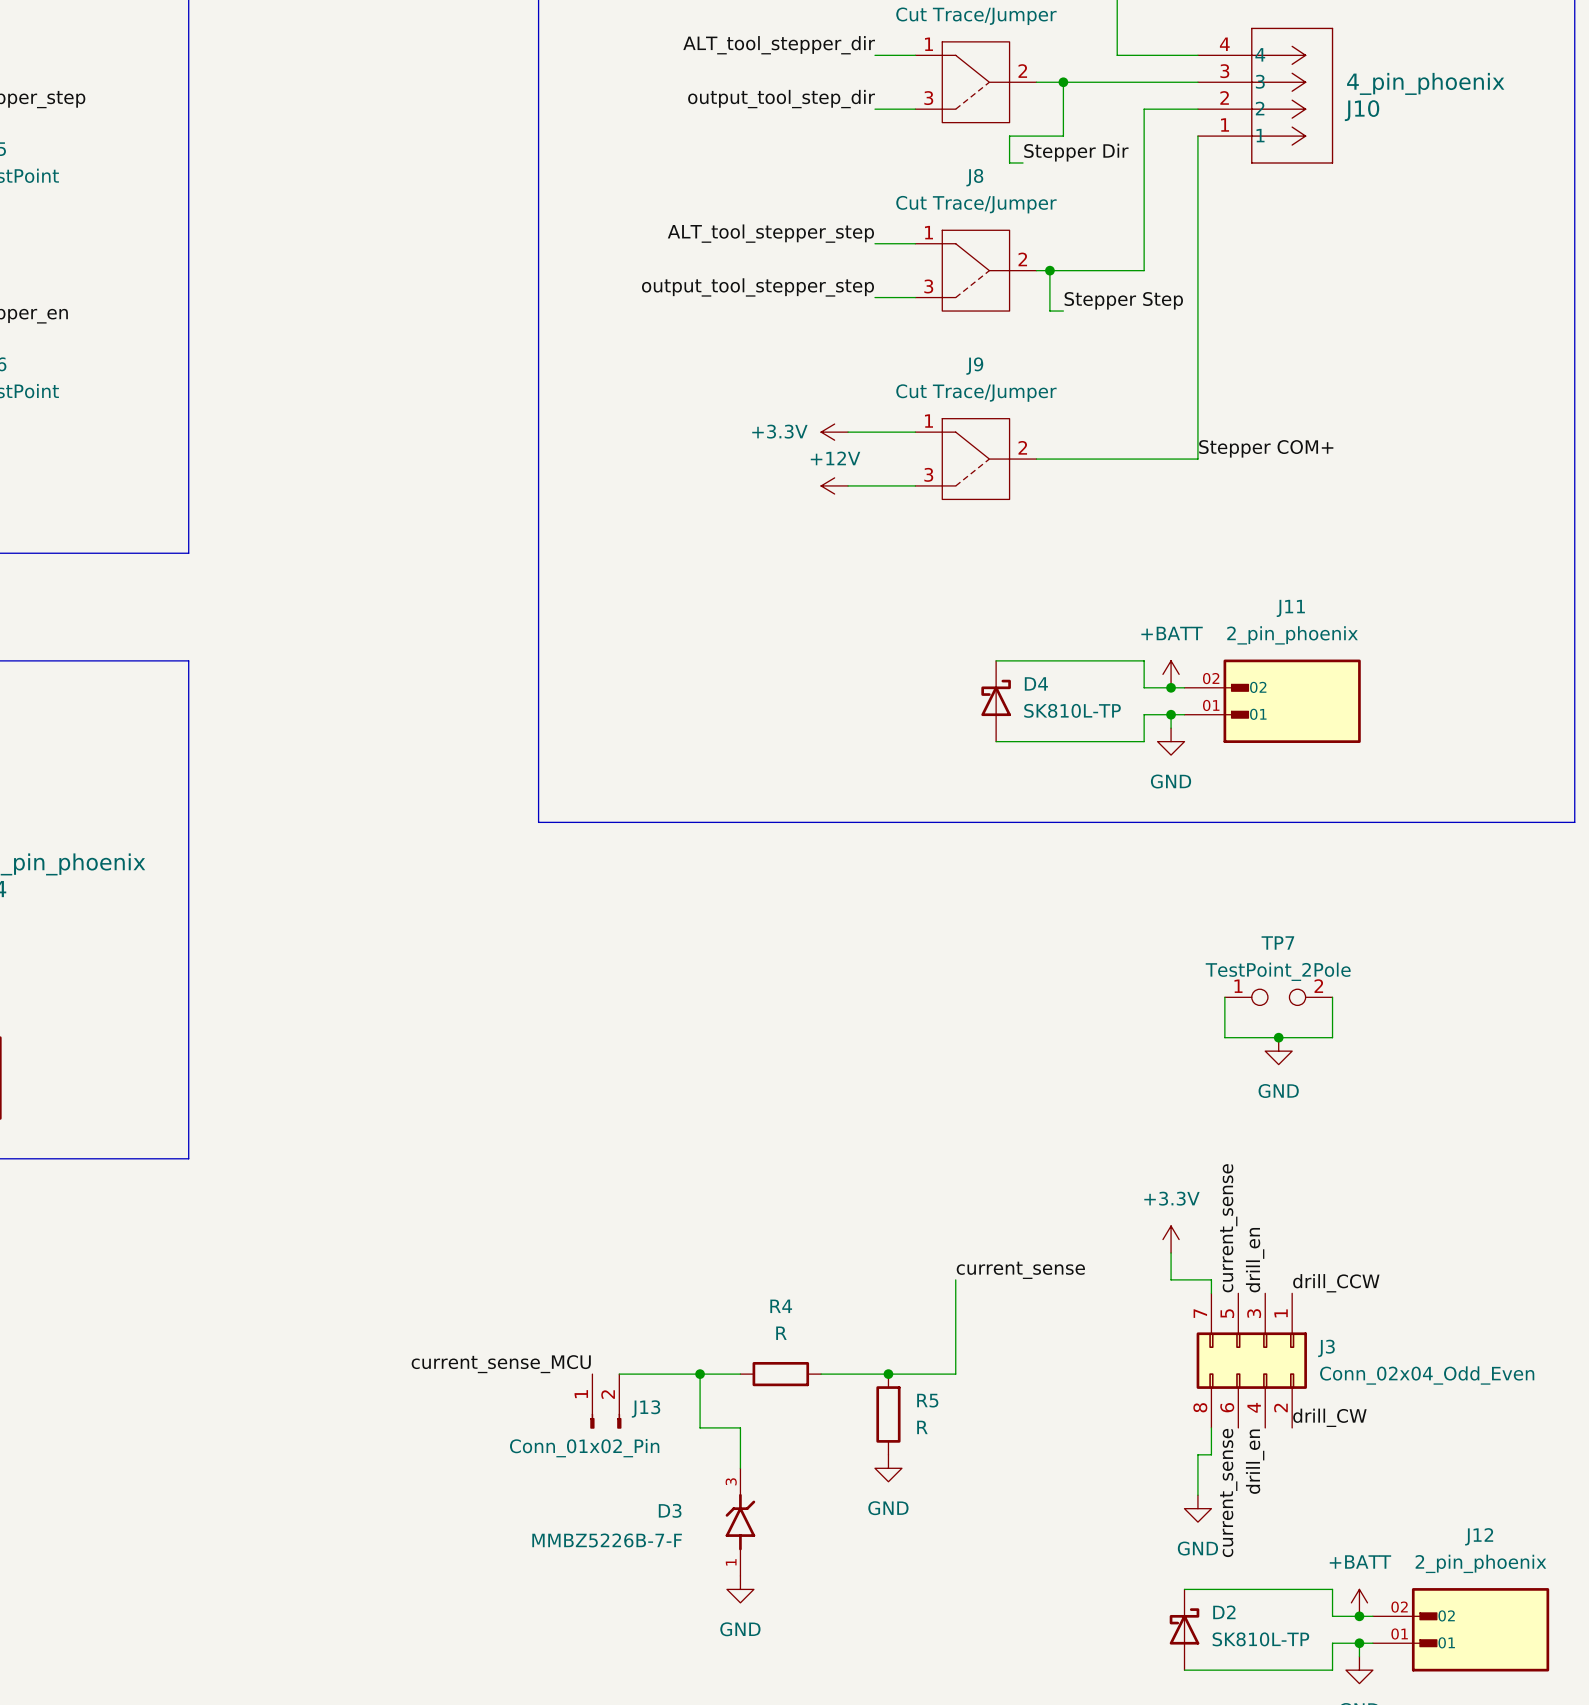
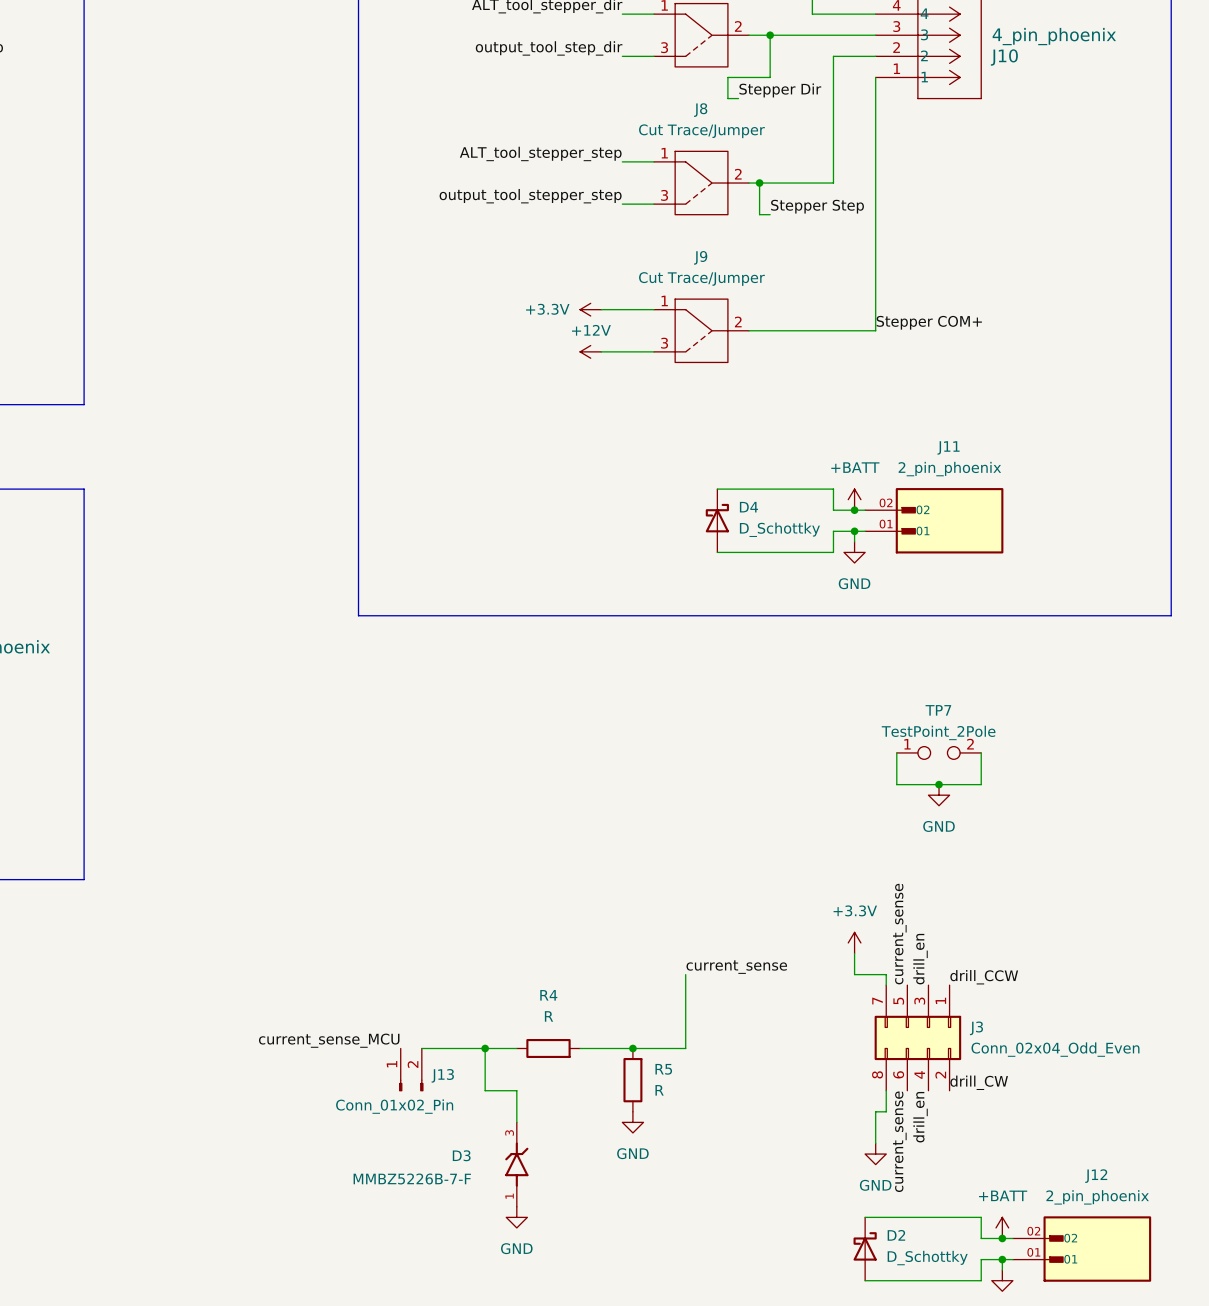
D4 value: SK810L-TP (1072, 710) -> D_Schottky (779, 529)
D2 value: SK810L-TP (1260, 1639) -> D_Schottky (927, 1258)

